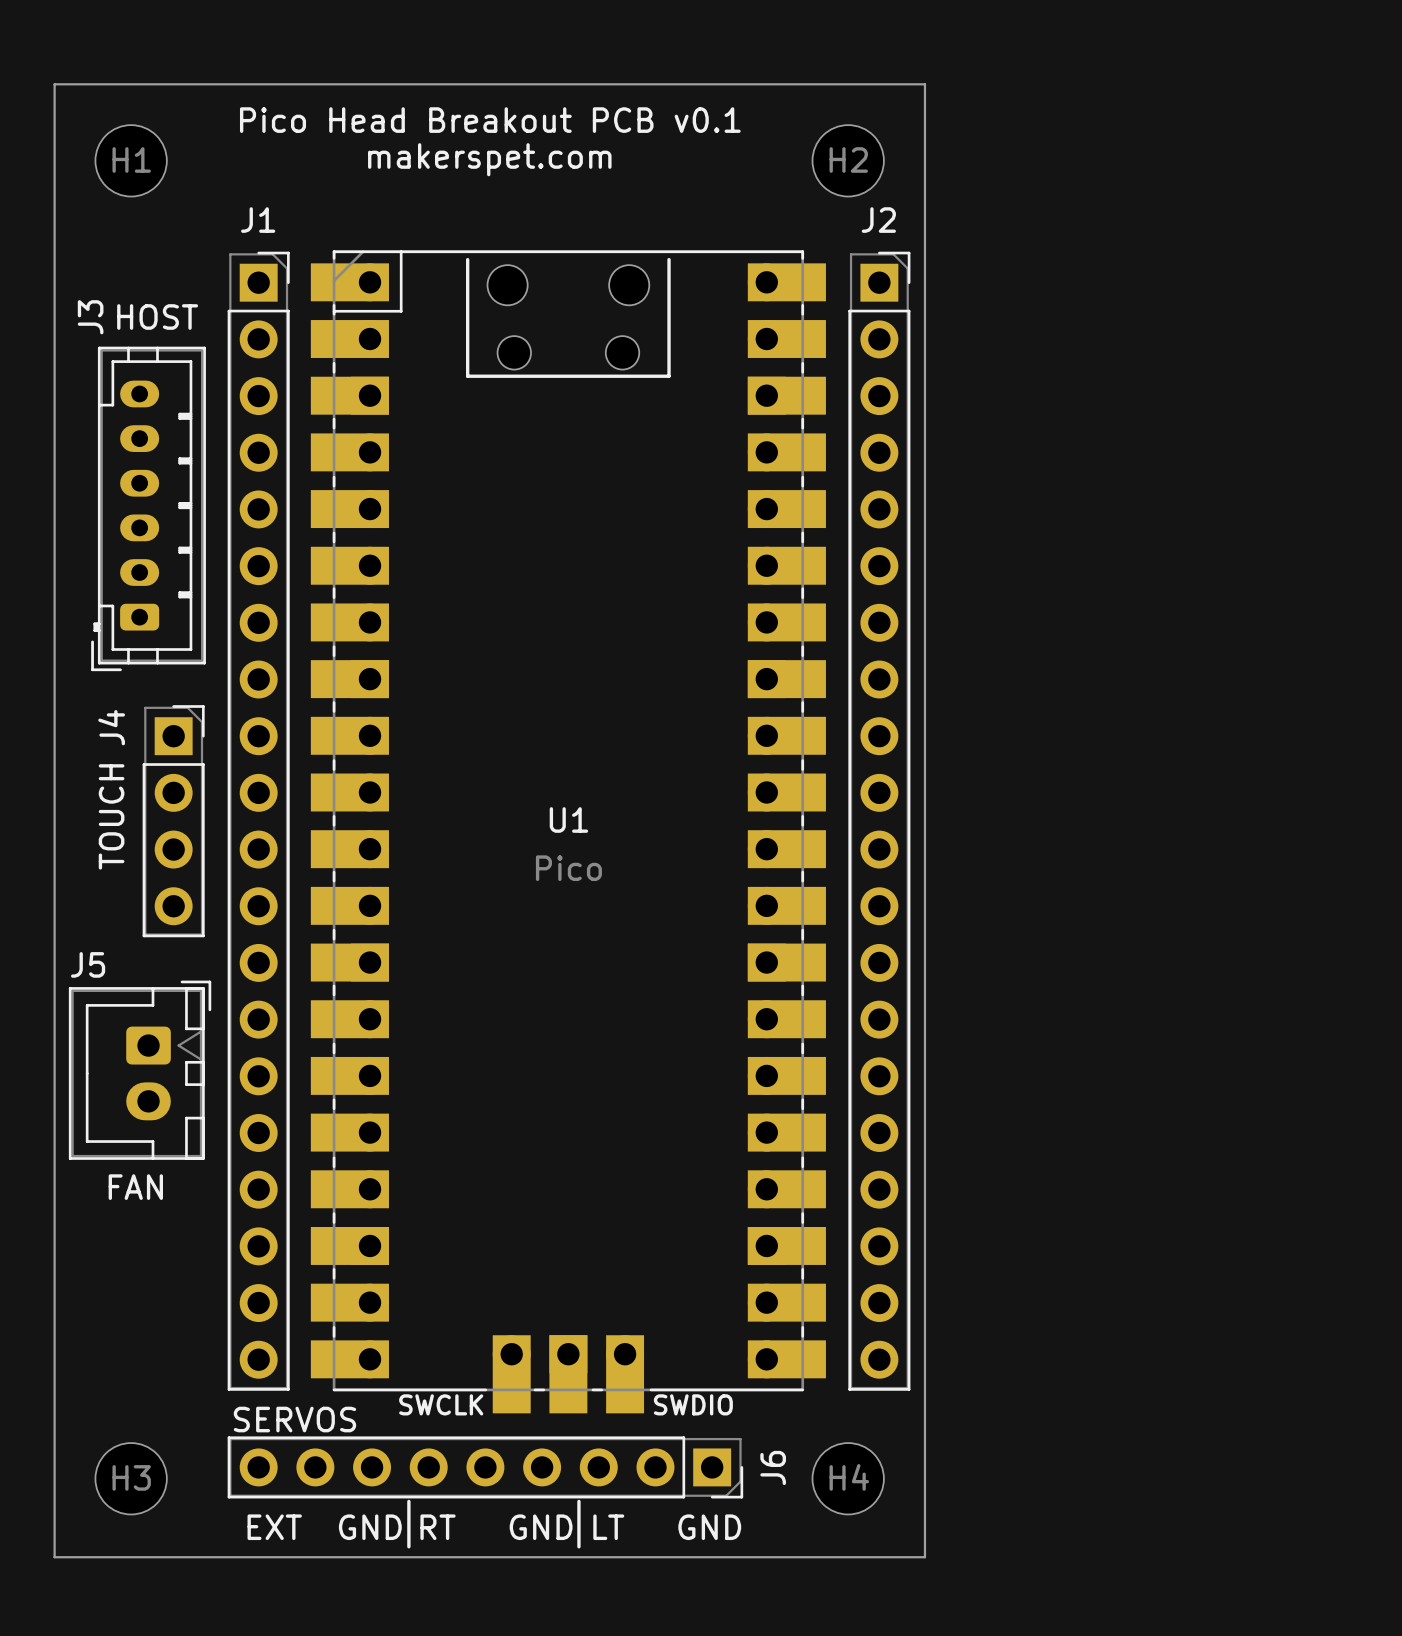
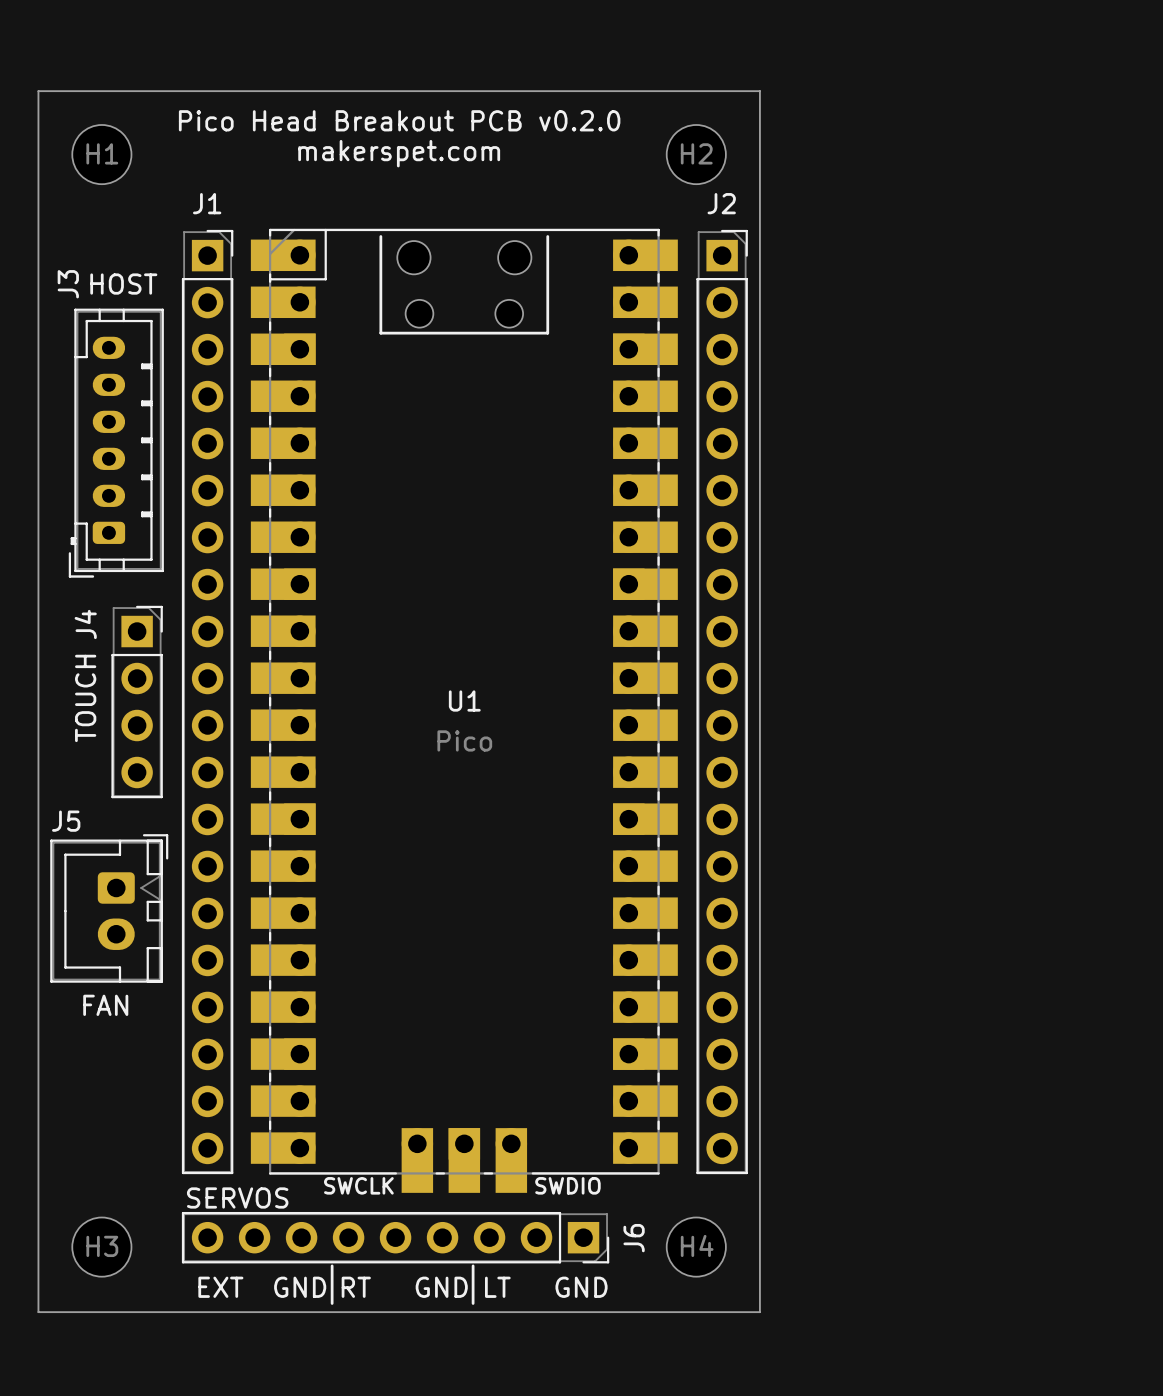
text: Pico Head Breakout PCB v0.1 (490, 120) -> Pico Head Breakout PCB v0.2.0 (399, 120)

